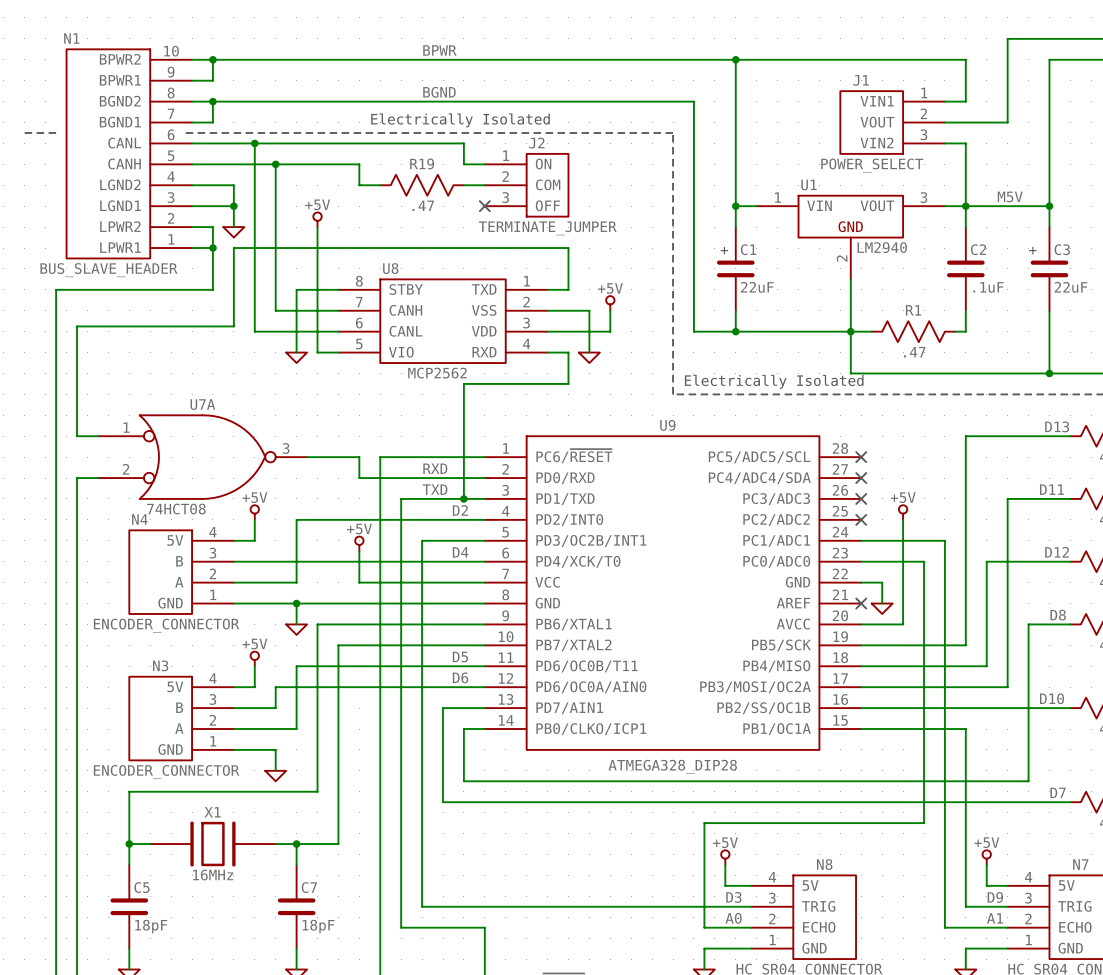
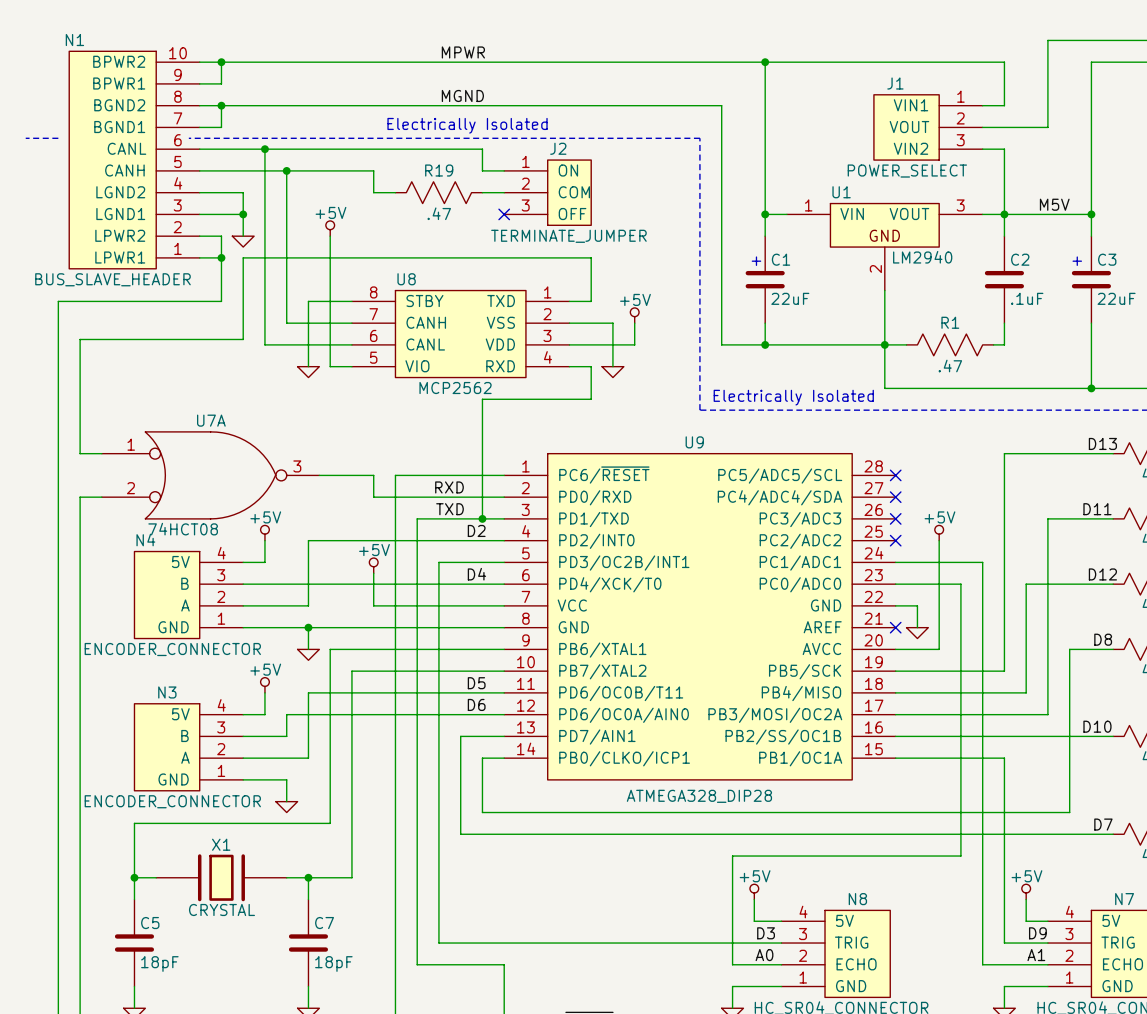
label: BPWR (439, 50) -> MPWR (463, 52)
label: BGND (439, 92) -> MGND (462, 95)
X1 value: 16MHz (213, 875) -> CRYSTAL (221, 909)

